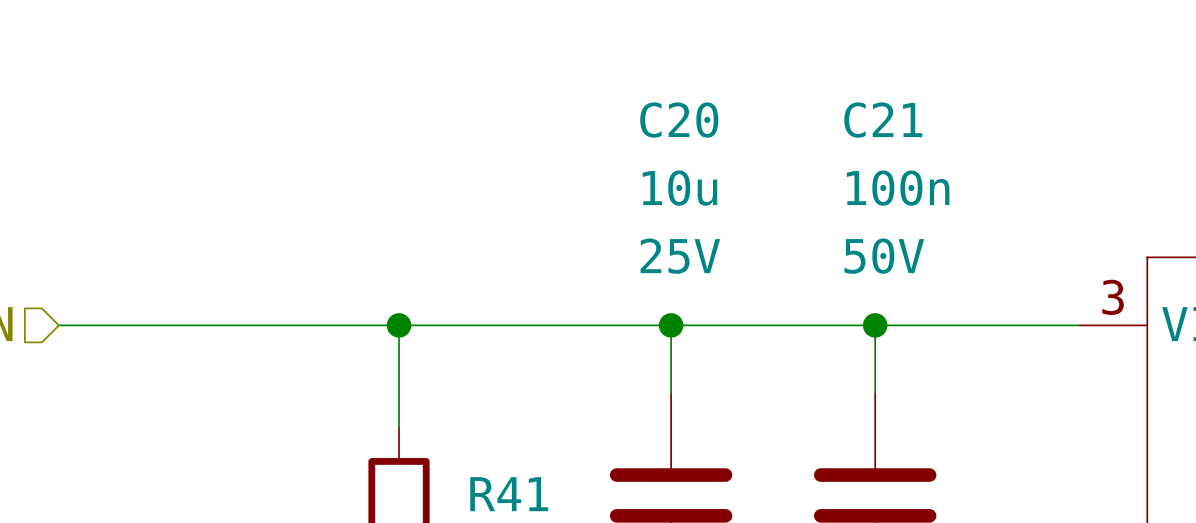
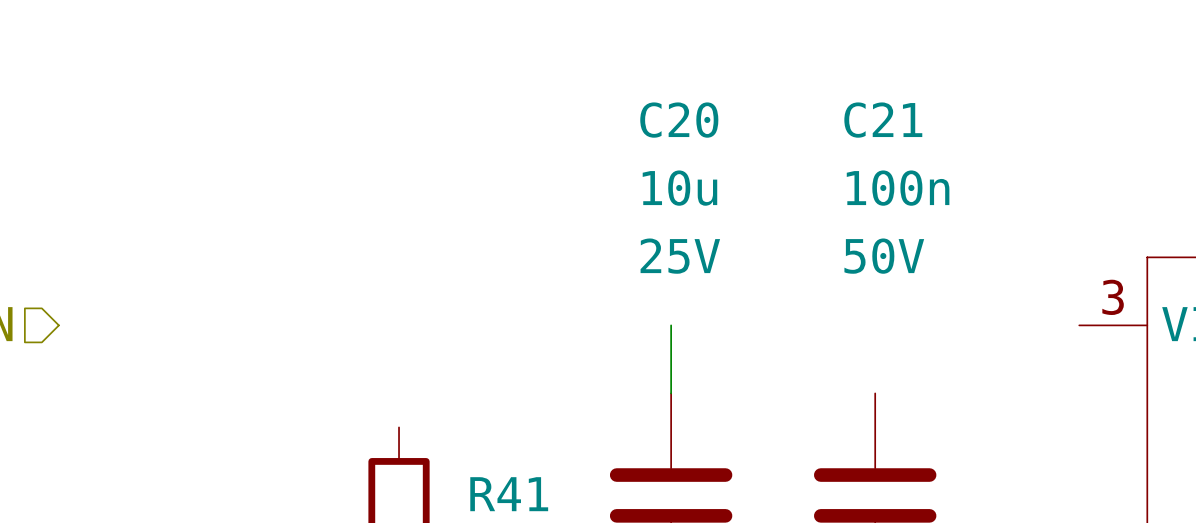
wire: (58, 325) (1079, 325) -> none
wire: (399, 325) (399, 427) -> none
junction: (399, 325) -> none
junction: (671, 325) -> none
wire: (875, 325) (875, 393) -> none
junction: (875, 325) -> none

